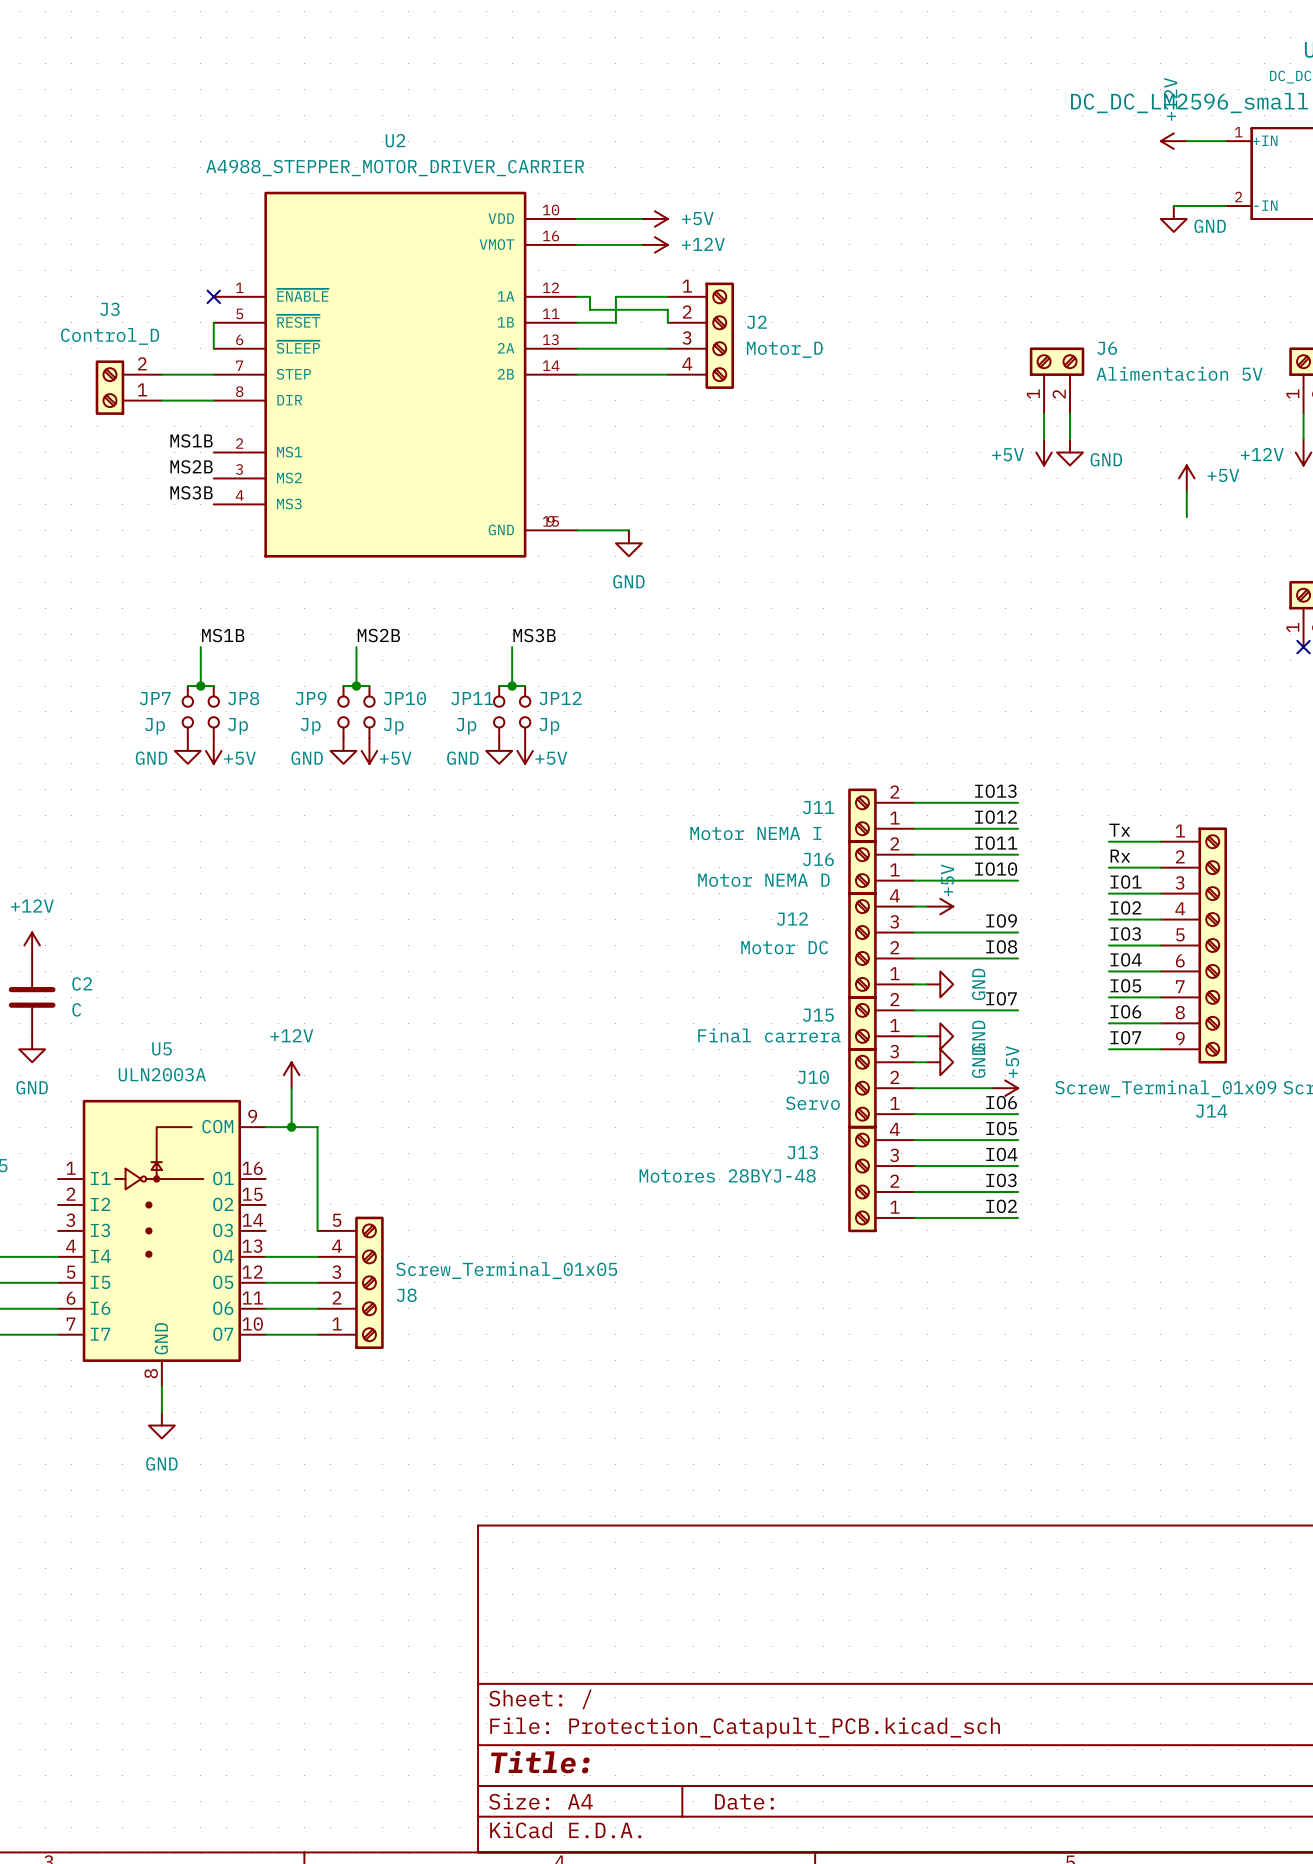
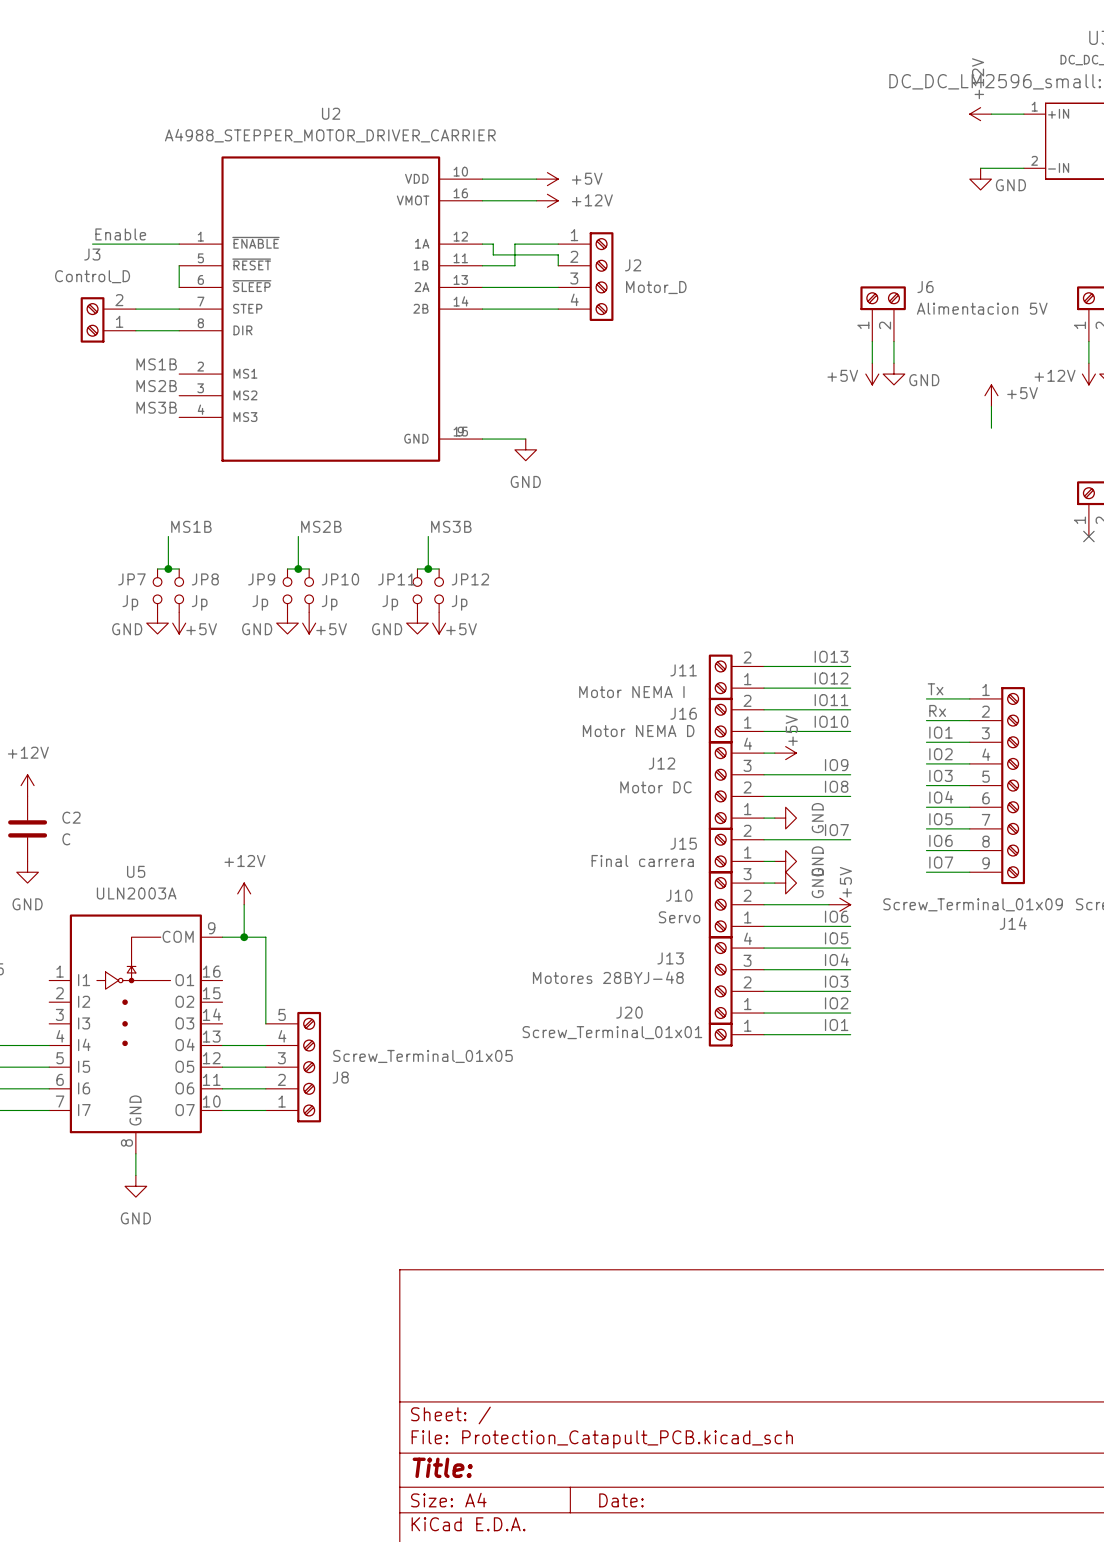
label: none -> Enable (120, 234)
wire: none -> (92, 244) (179, 244)
no-connect mark: (213, 296) -> none
label: none -> IO1 (836, 1025)
J20: none -> Screw_Terminal_01x01 (736, 1034)
wire: none -> (764, 1034) (850, 1034)

